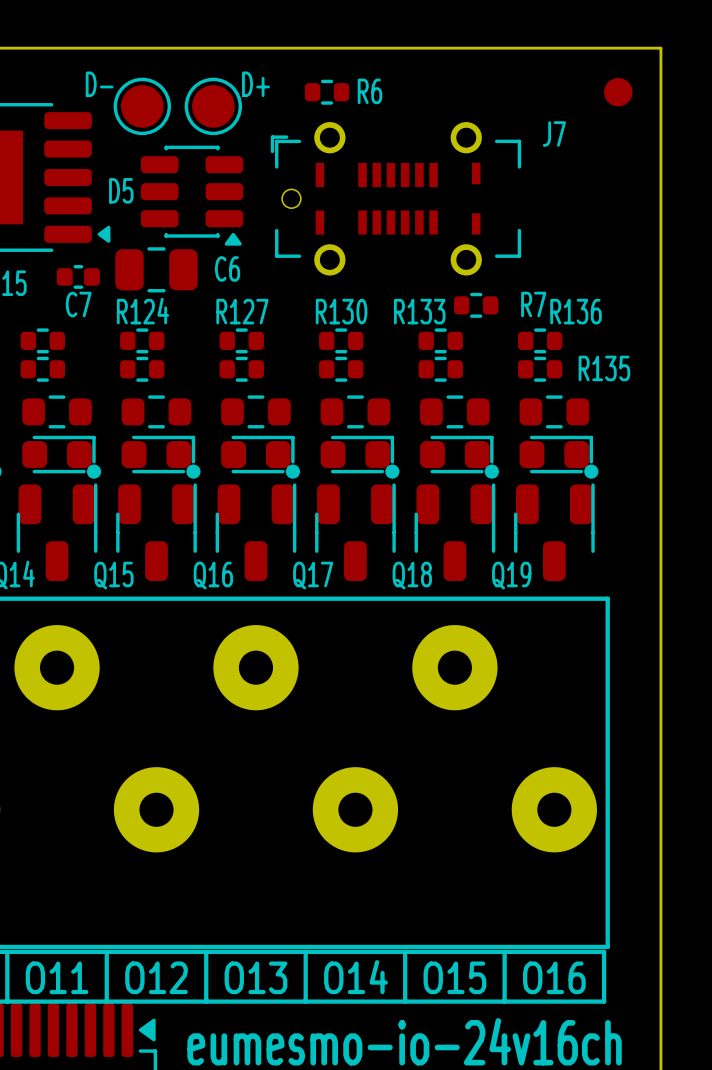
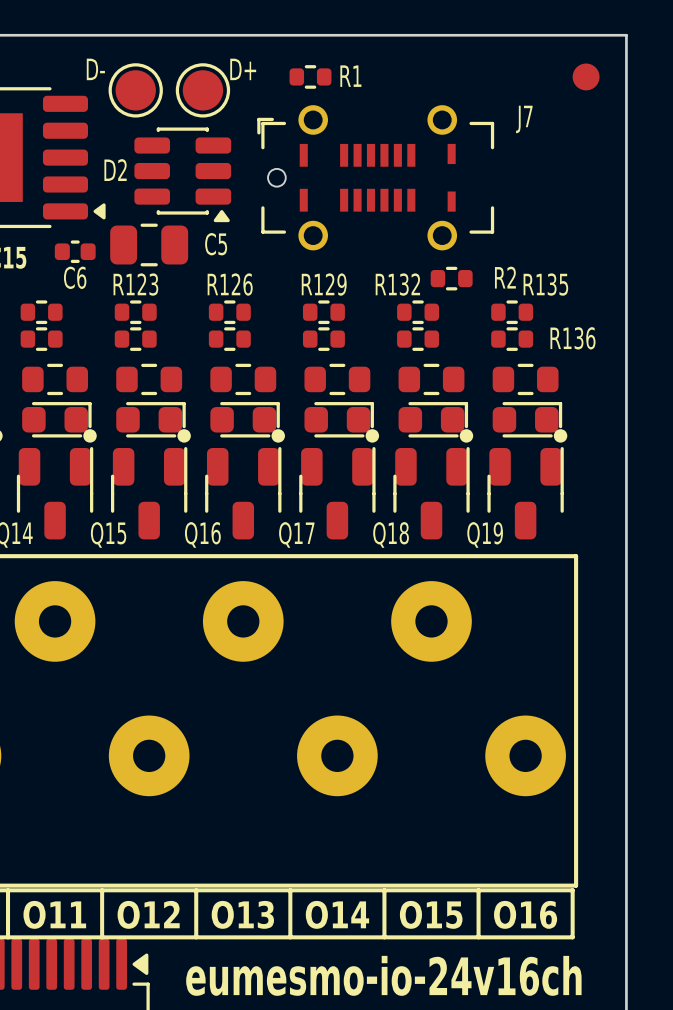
R6 name: R6 (369, 91) -> R1 (350, 76)
D5 name: D5 (121, 190) -> D2 (115, 170)
C6 name: C6 (227, 268) -> C5 (216, 244)
C7 name: C7 (78, 304) -> C6 (75, 277)
R7 name: R7 (533, 304) -> R2 (505, 277)
R124 name: R124 (142, 311) -> R123 (135, 284)
R127 name: R127 (242, 311) -> R126 (230, 284)
R130 name: R130 (341, 311) -> R129 (324, 284)
R133 name: R133 (419, 311) -> R132 (397, 284)
R136 name: R136 (576, 311) -> R135 (545, 284)
R135 name: R135 (604, 368) -> R136 (572, 338)

